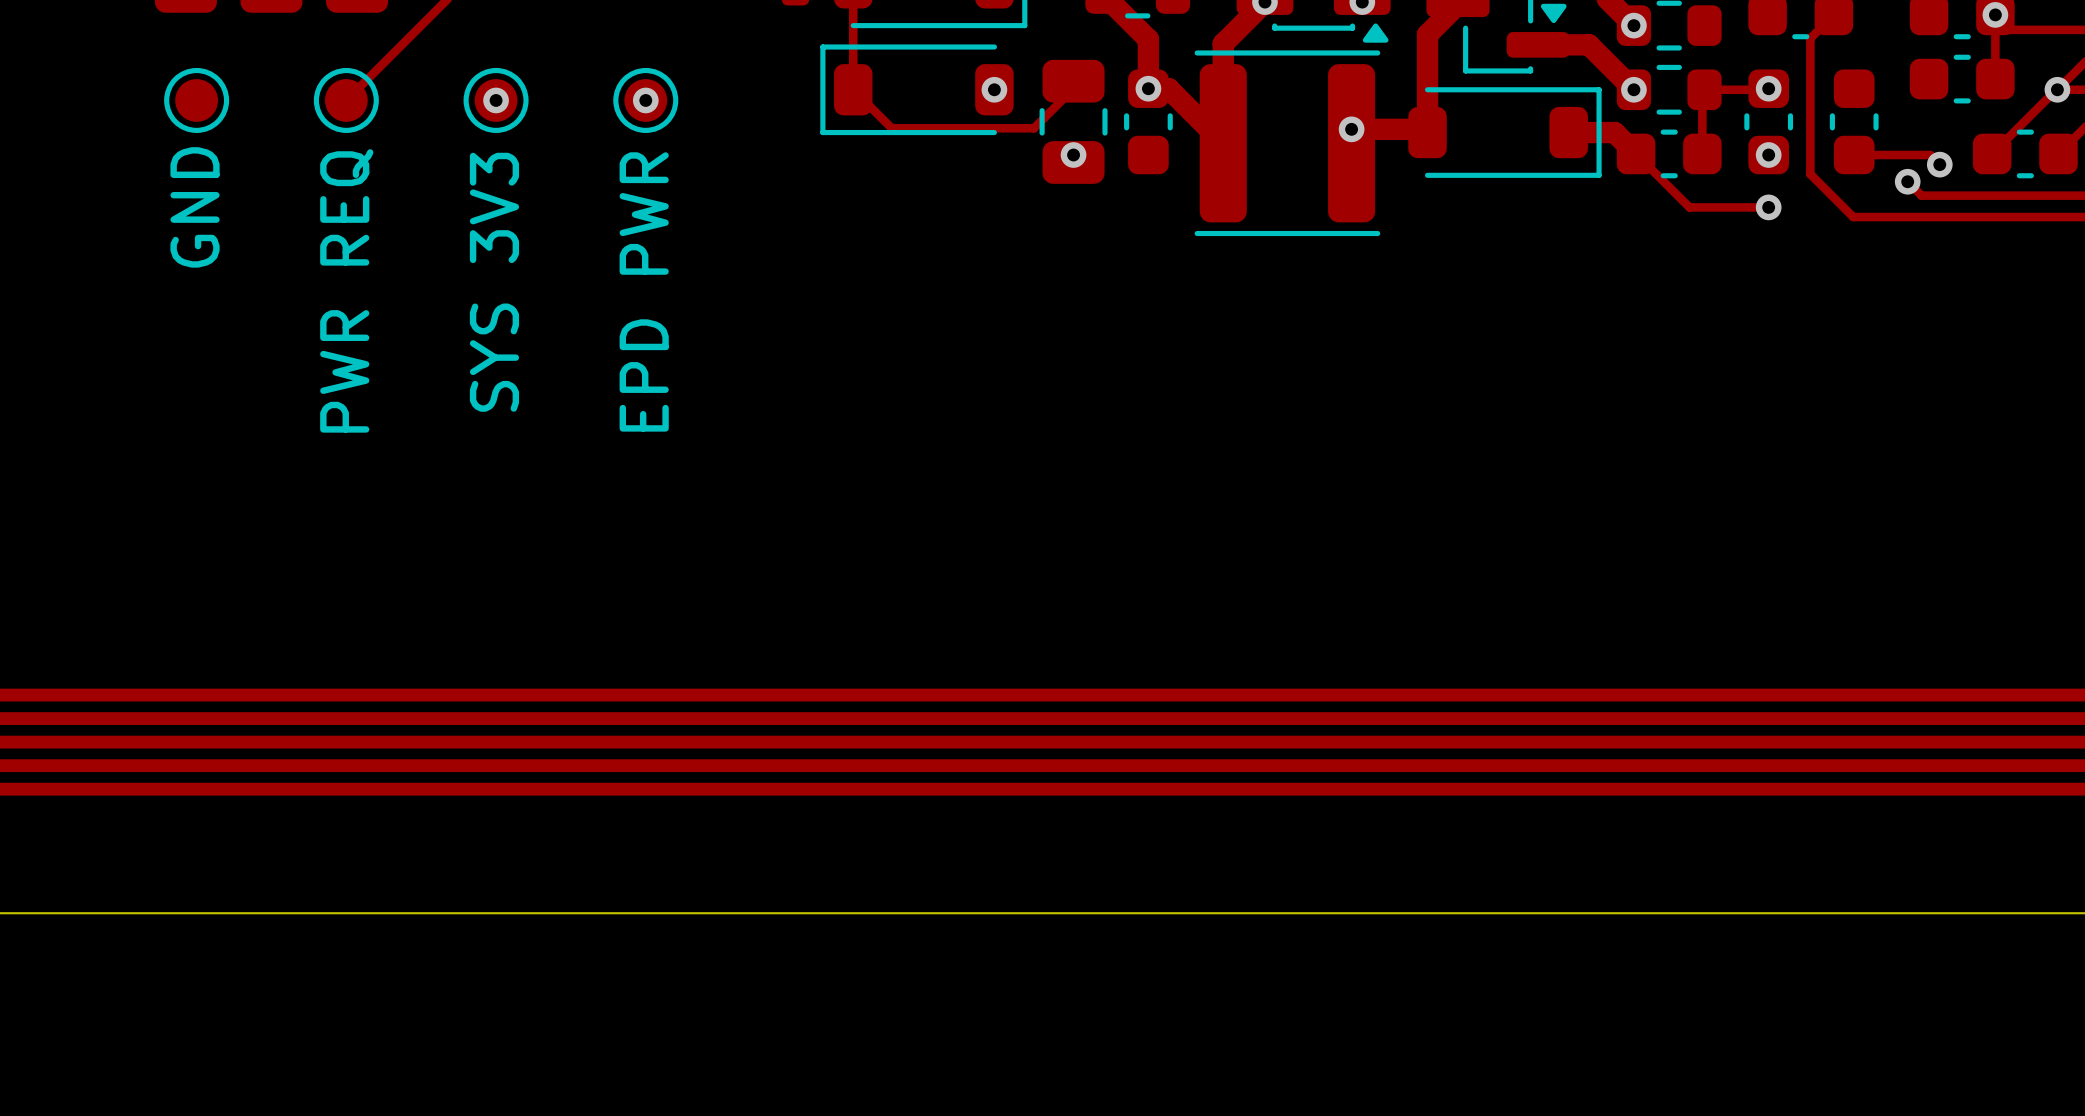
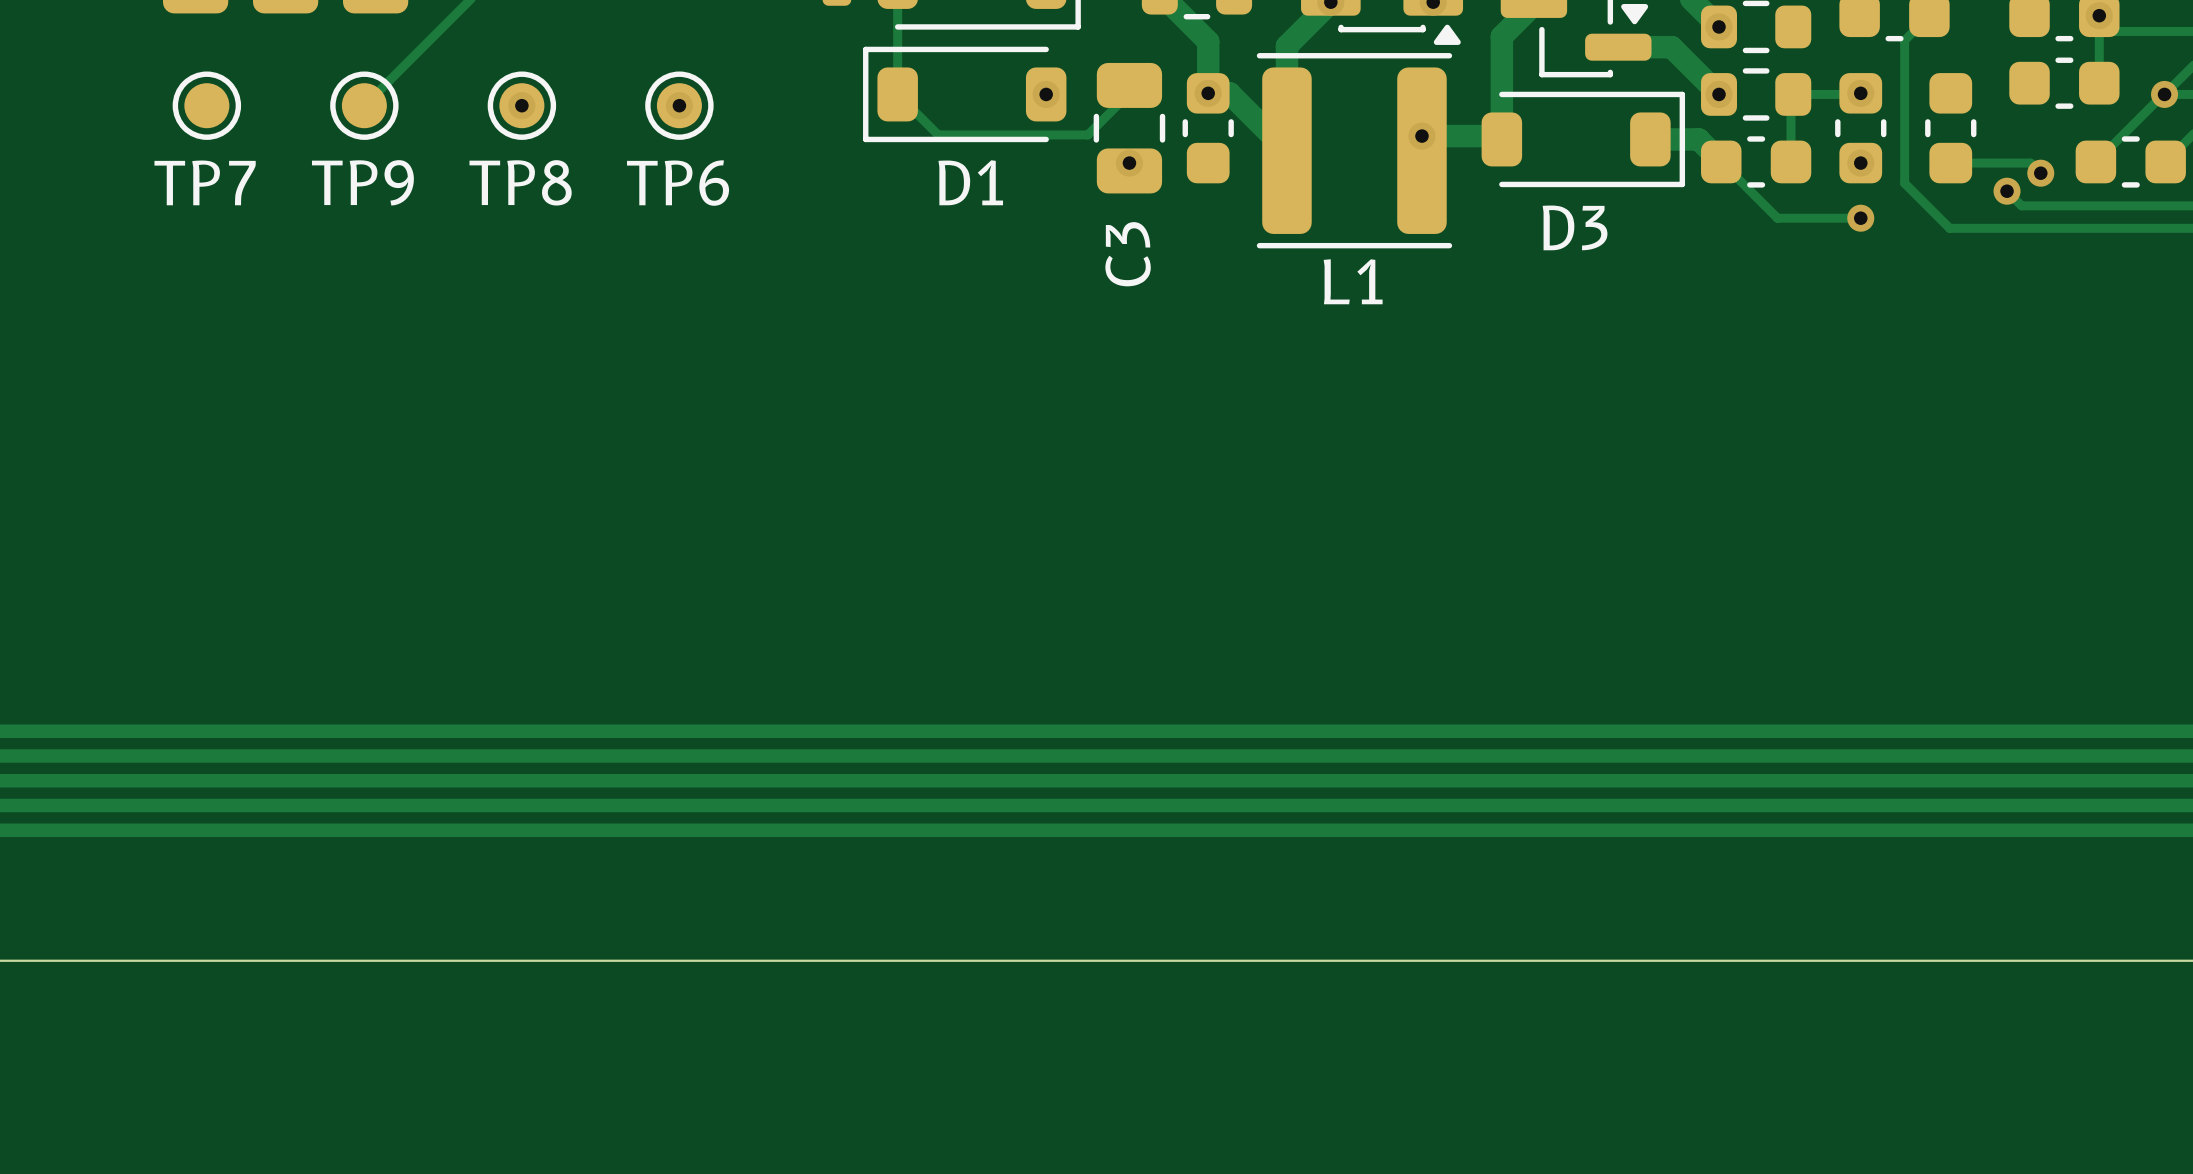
D1 name: none -> D1 (970, 182)
GND name: GND (195, 207) -> TP7 (205, 182)
D3 name: none -> D3 (1575, 227)
C3 name: none -> C3 (1128, 254)
L1 name: none -> L1 (1353, 281)
SYS 3V3 name: SYS 3V3 (494, 282) -> TP8 (520, 182)
PWR REQ name: PWR REQ (346, 290) -> TP9 (362, 182)
EPD PWR name: EPD PWR (644, 291) -> TP6 (678, 183)

